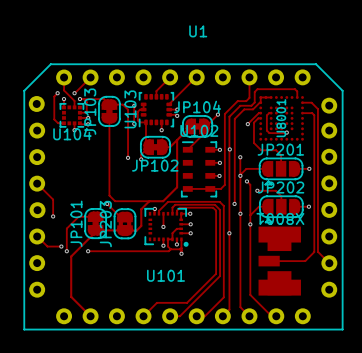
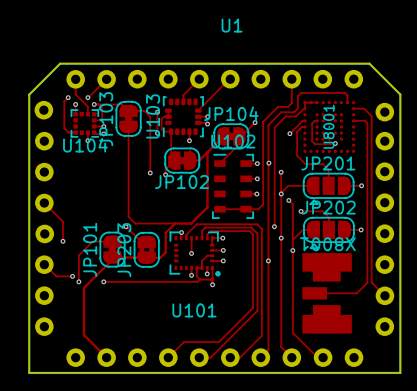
board edge: none -> (60, 63) (29, 94) (29, 372) (400, 372) (400, 94) (369, 63) (60, 63)

